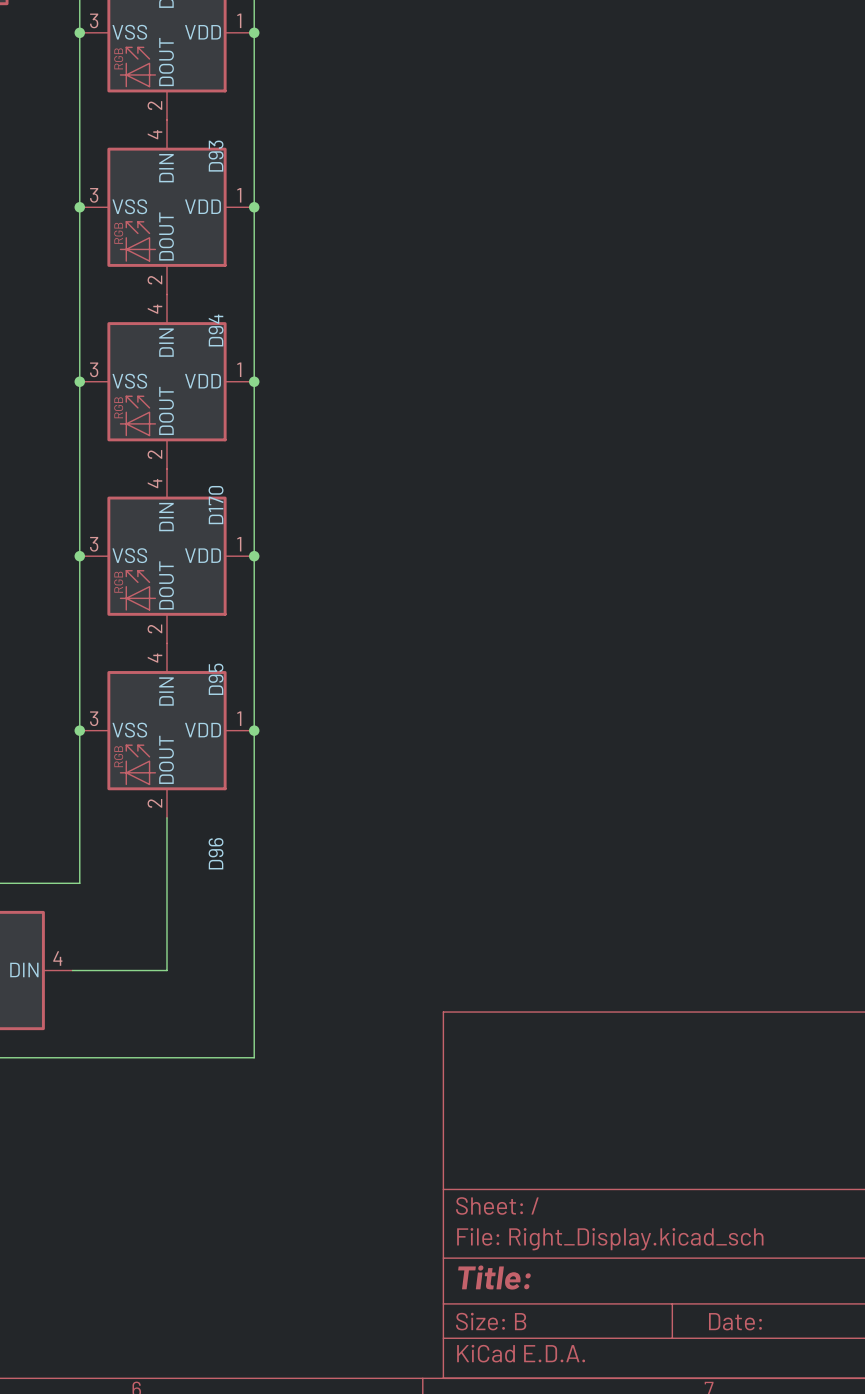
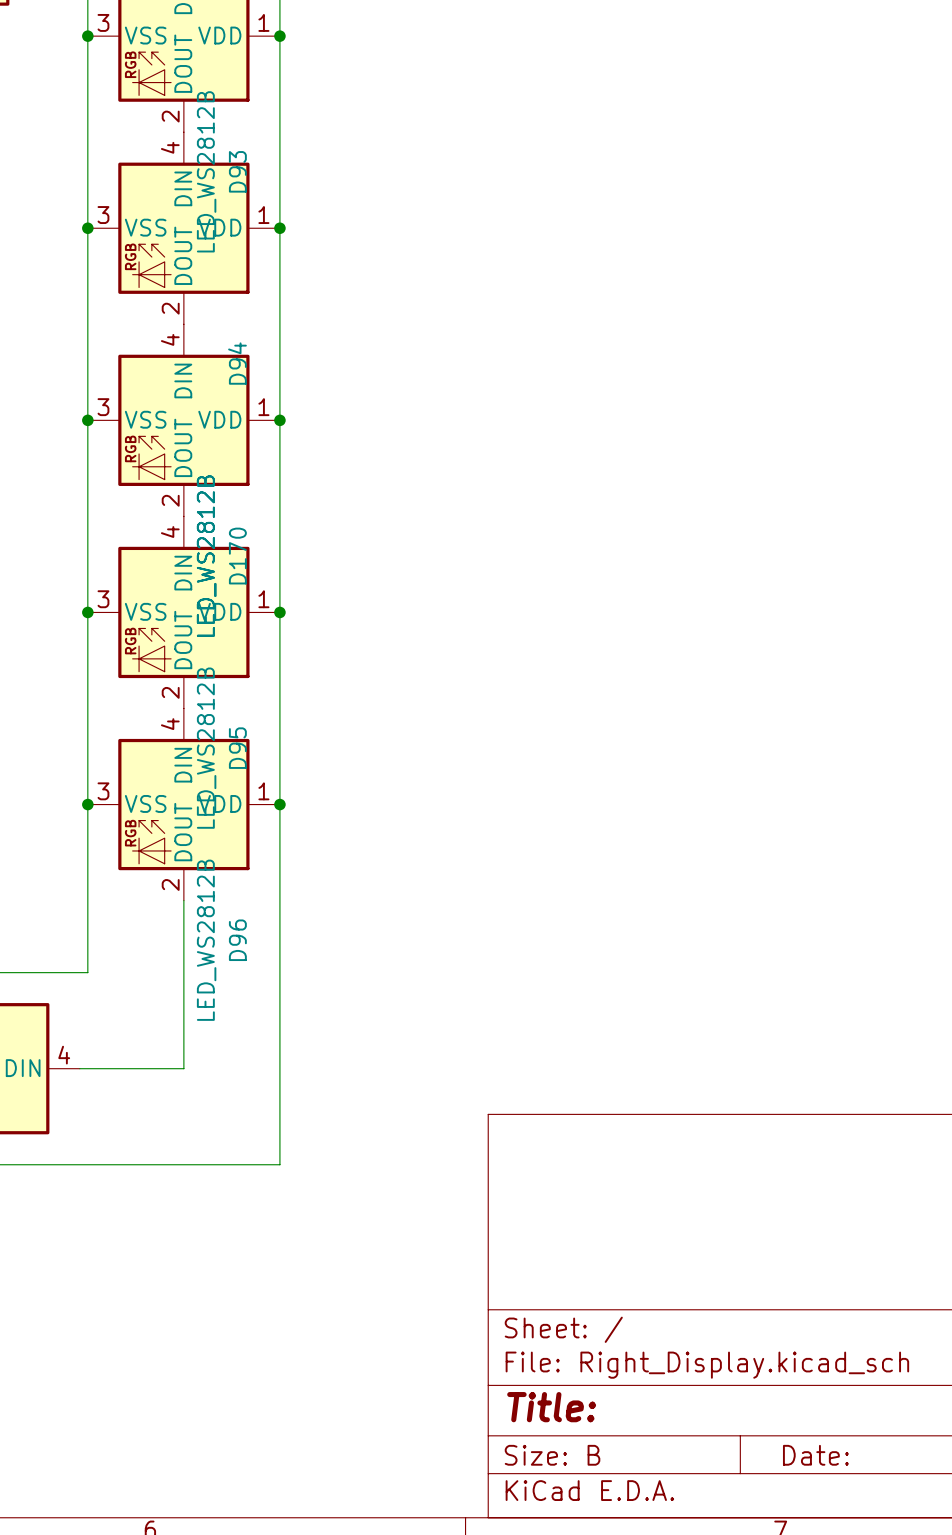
D93 value: none -> LED_WS2812B (206, 171)
D94 value: none -> LED_WS2812B (206, 556)
D170 value: none -> LED_WS2812B (206, 556)
D95 value: none -> LED_WS2812B (206, 748)
D96 value: none -> LED_WS2812B (206, 940)

